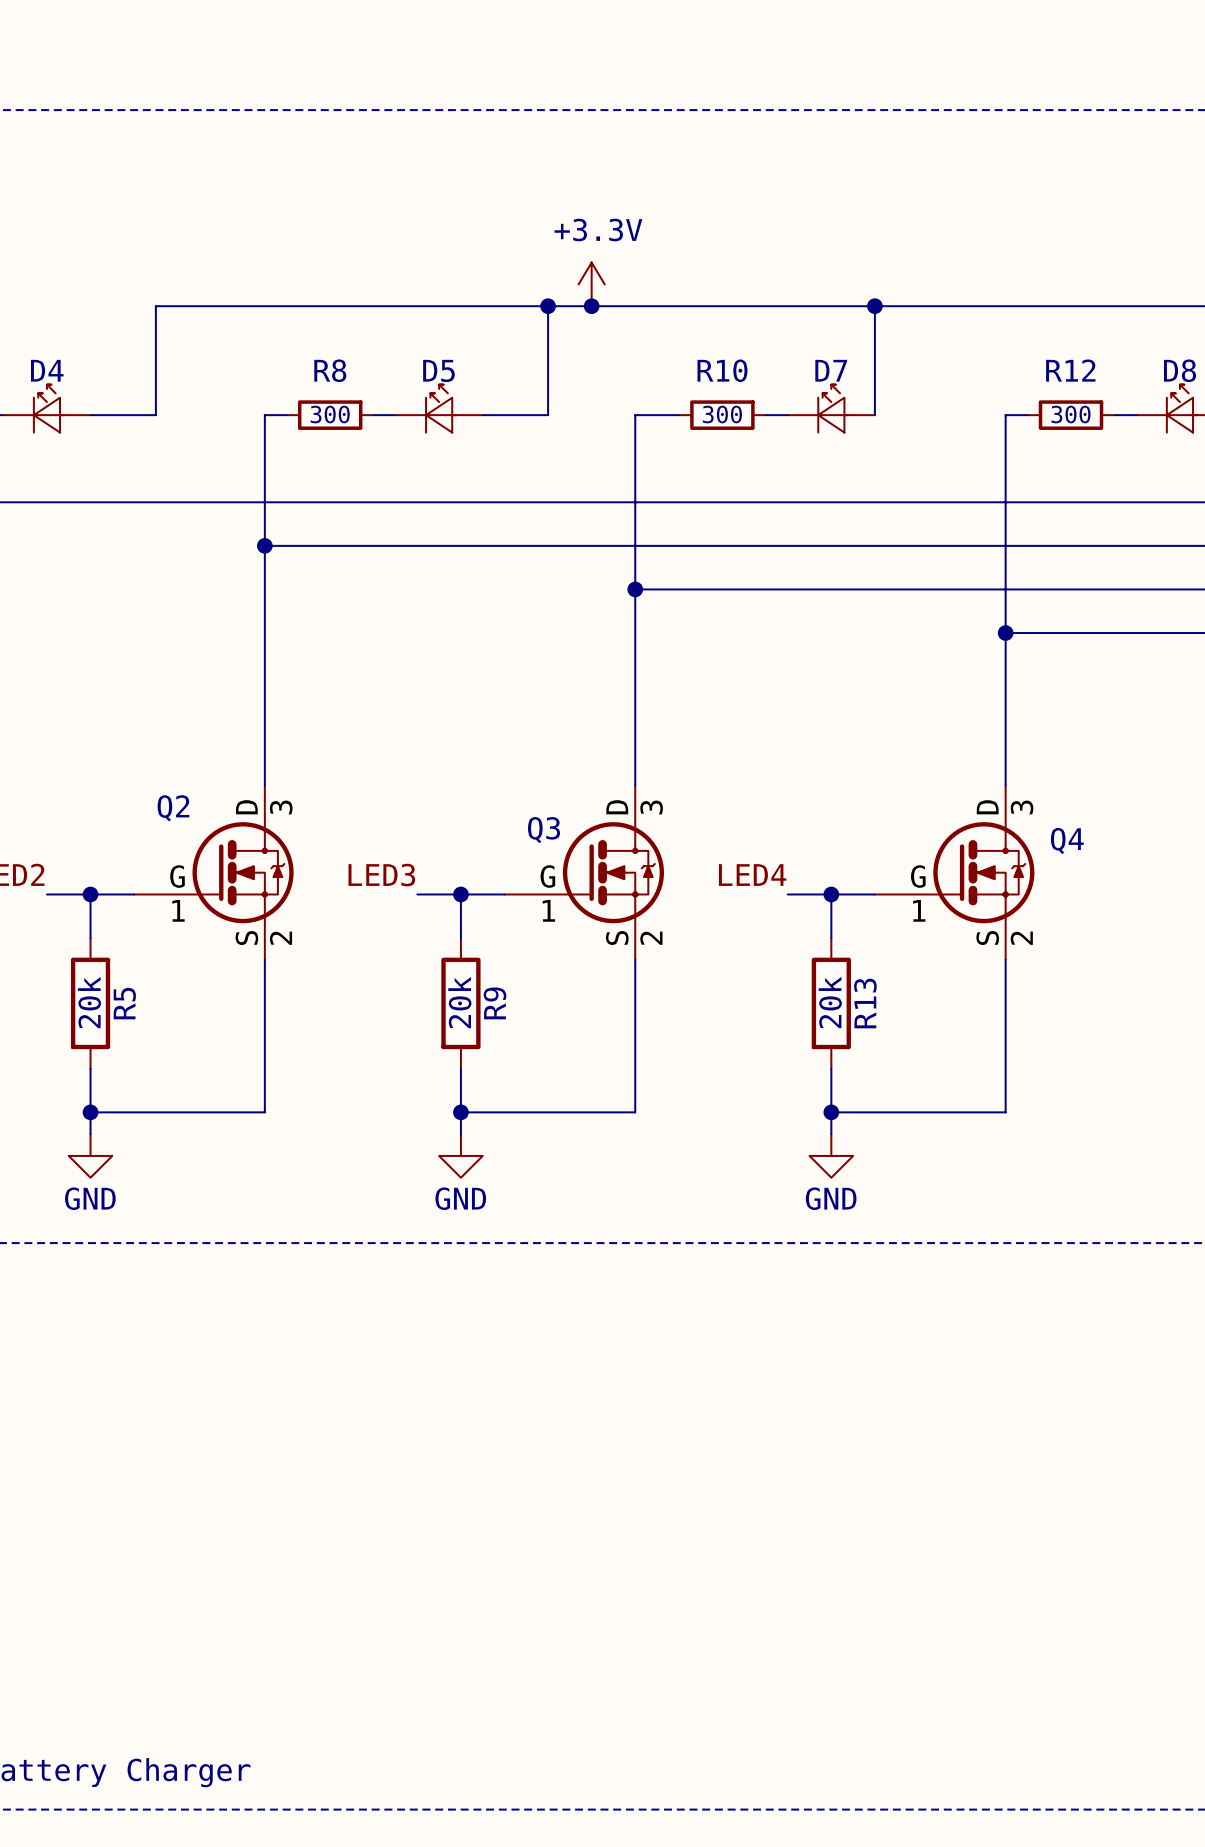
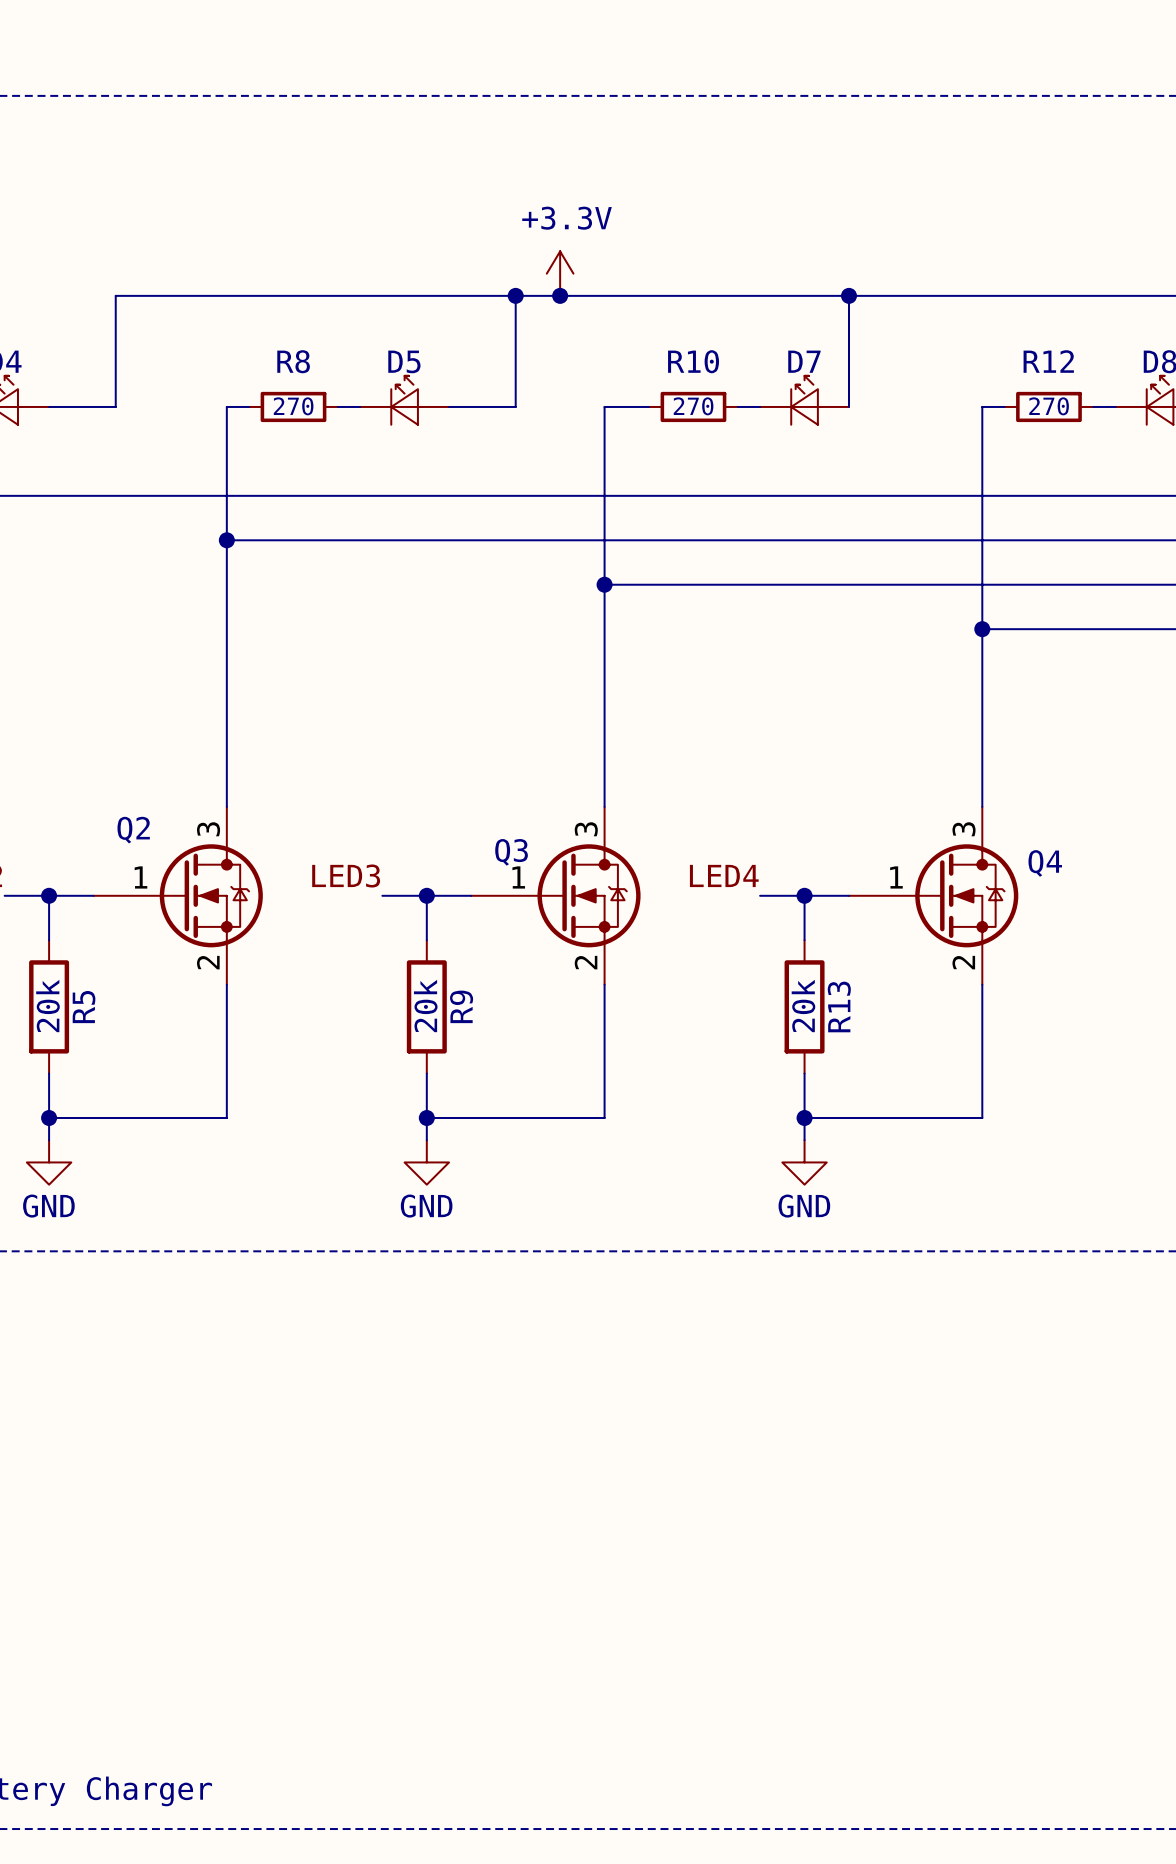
R8 value: 300 (330, 414) -> 270 (293, 406)
R10 value: 300 (722, 414) -> 270 (693, 406)
R12 value: 300 (1071, 414) -> 270 (1049, 406)
Q2 symbol: [134, 785, 294, 960] -> [93, 806, 263, 985]
Q3 symbol: [504, 785, 665, 960] -> [471, 806, 641, 985]
Q4 symbol: [874, 785, 1035, 960] -> [848, 806, 1019, 985]

